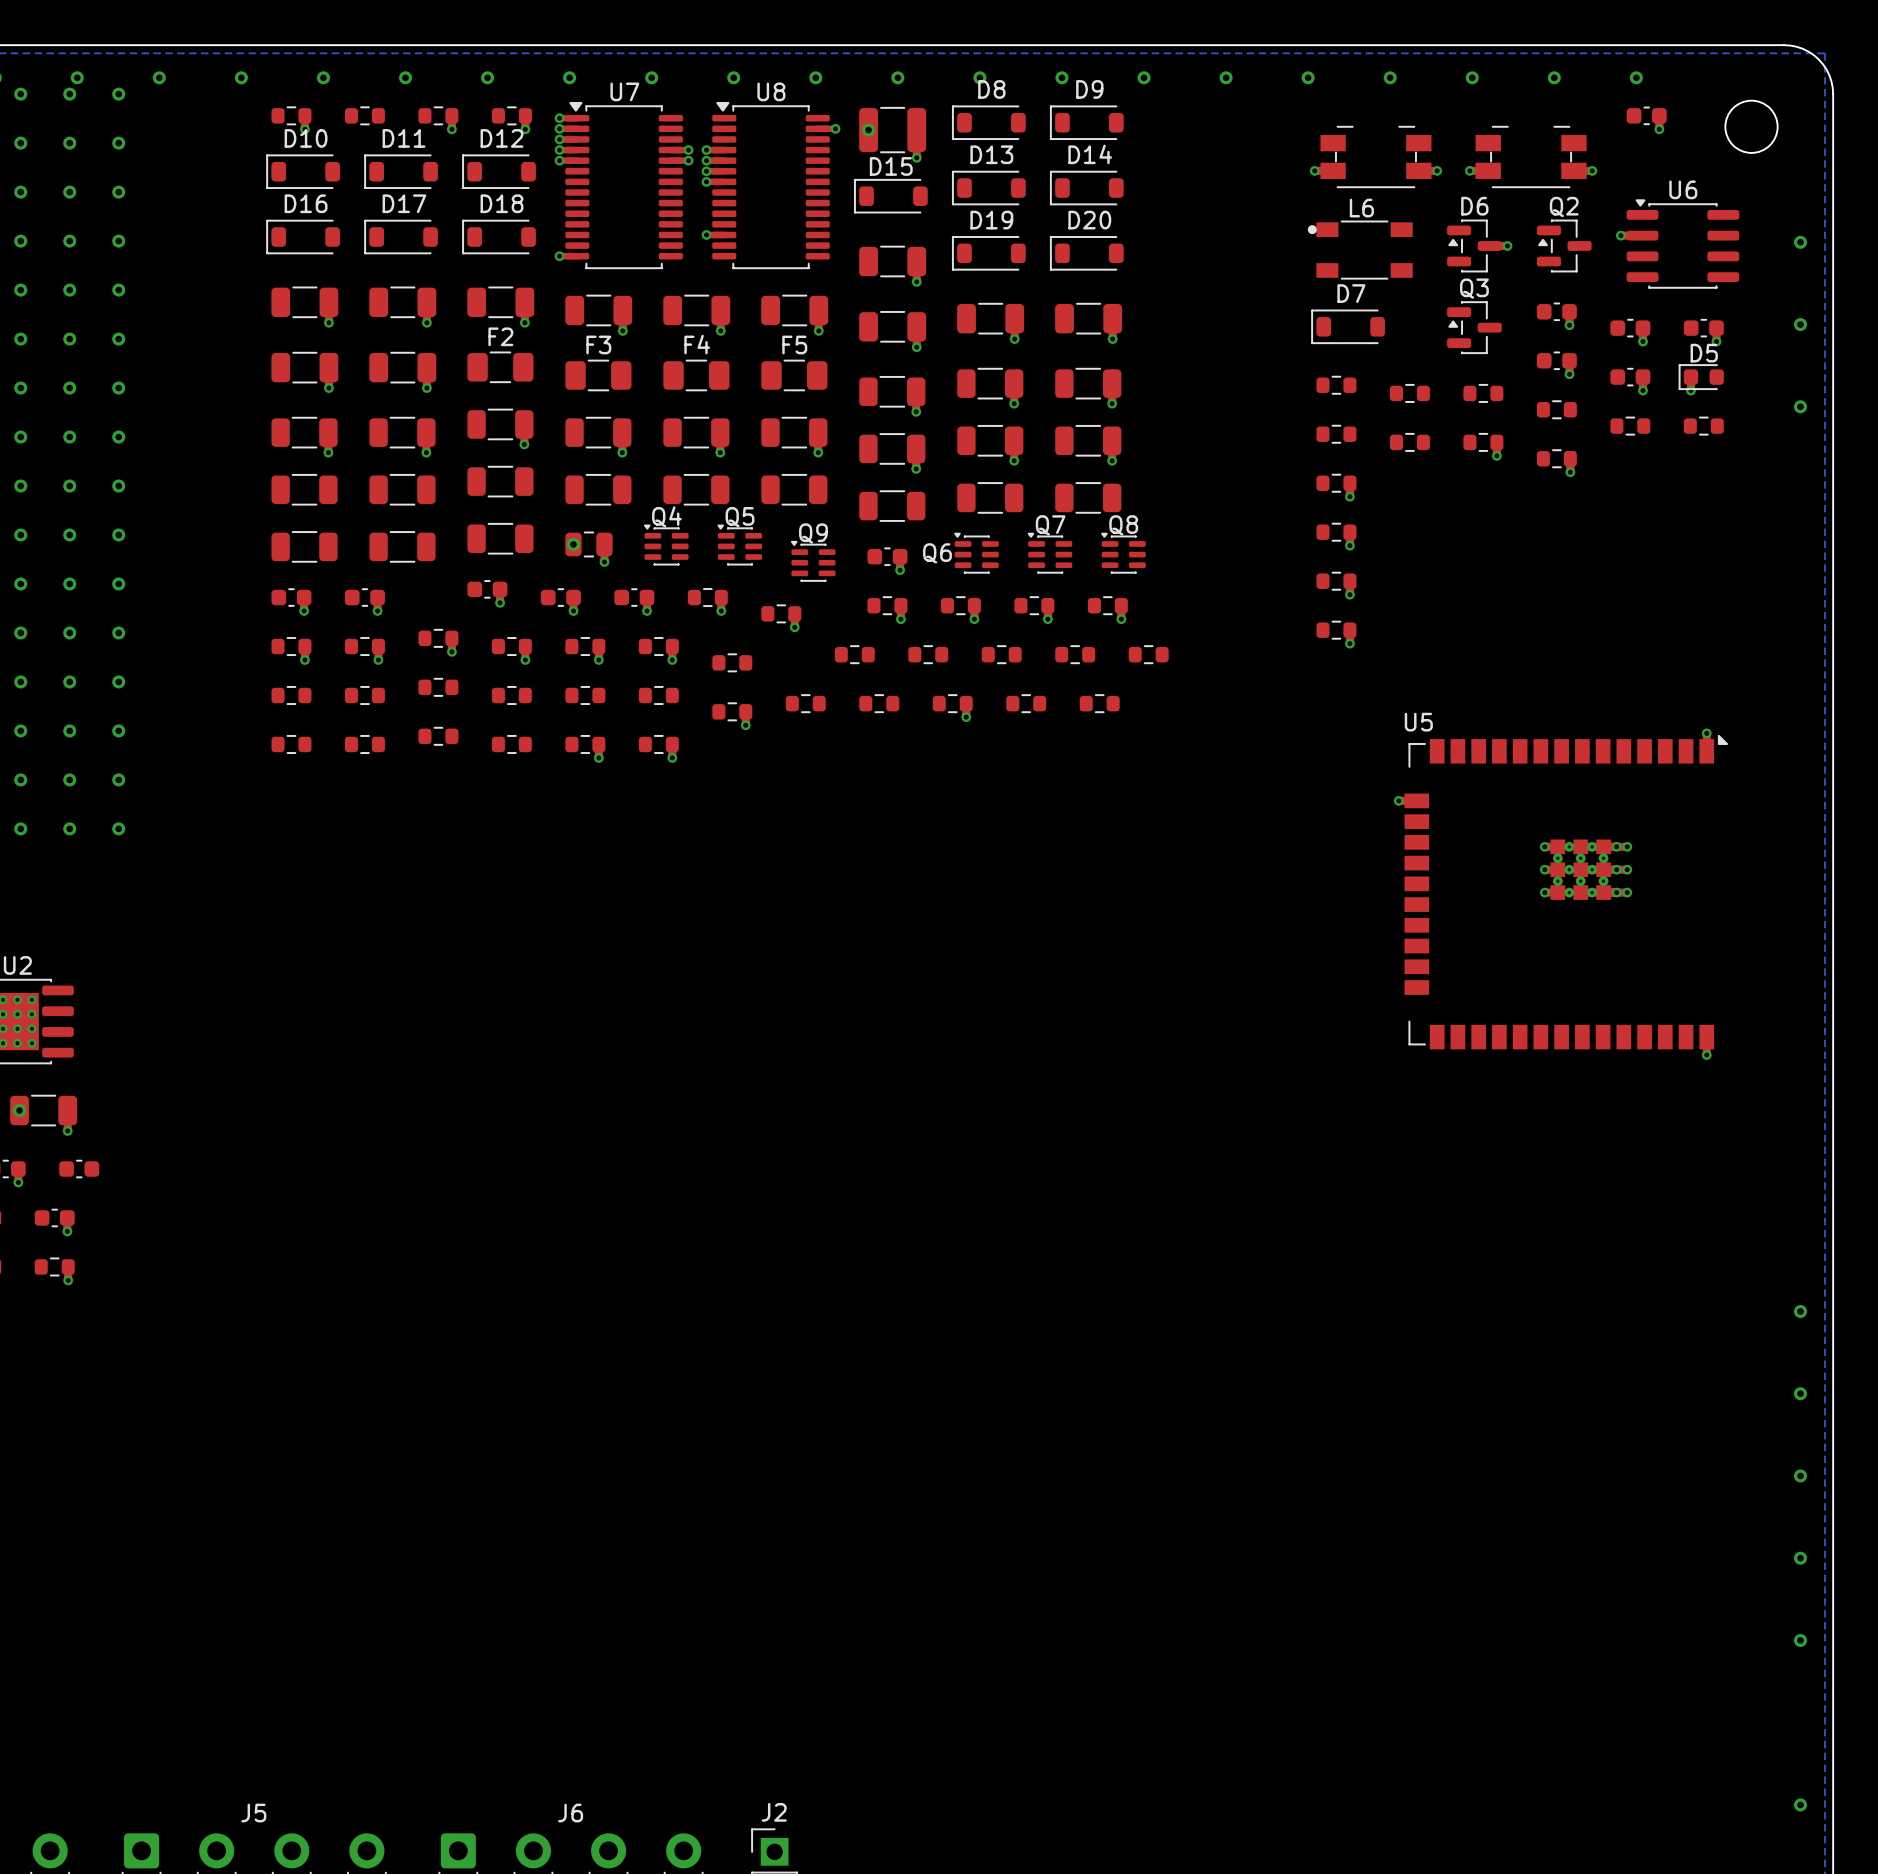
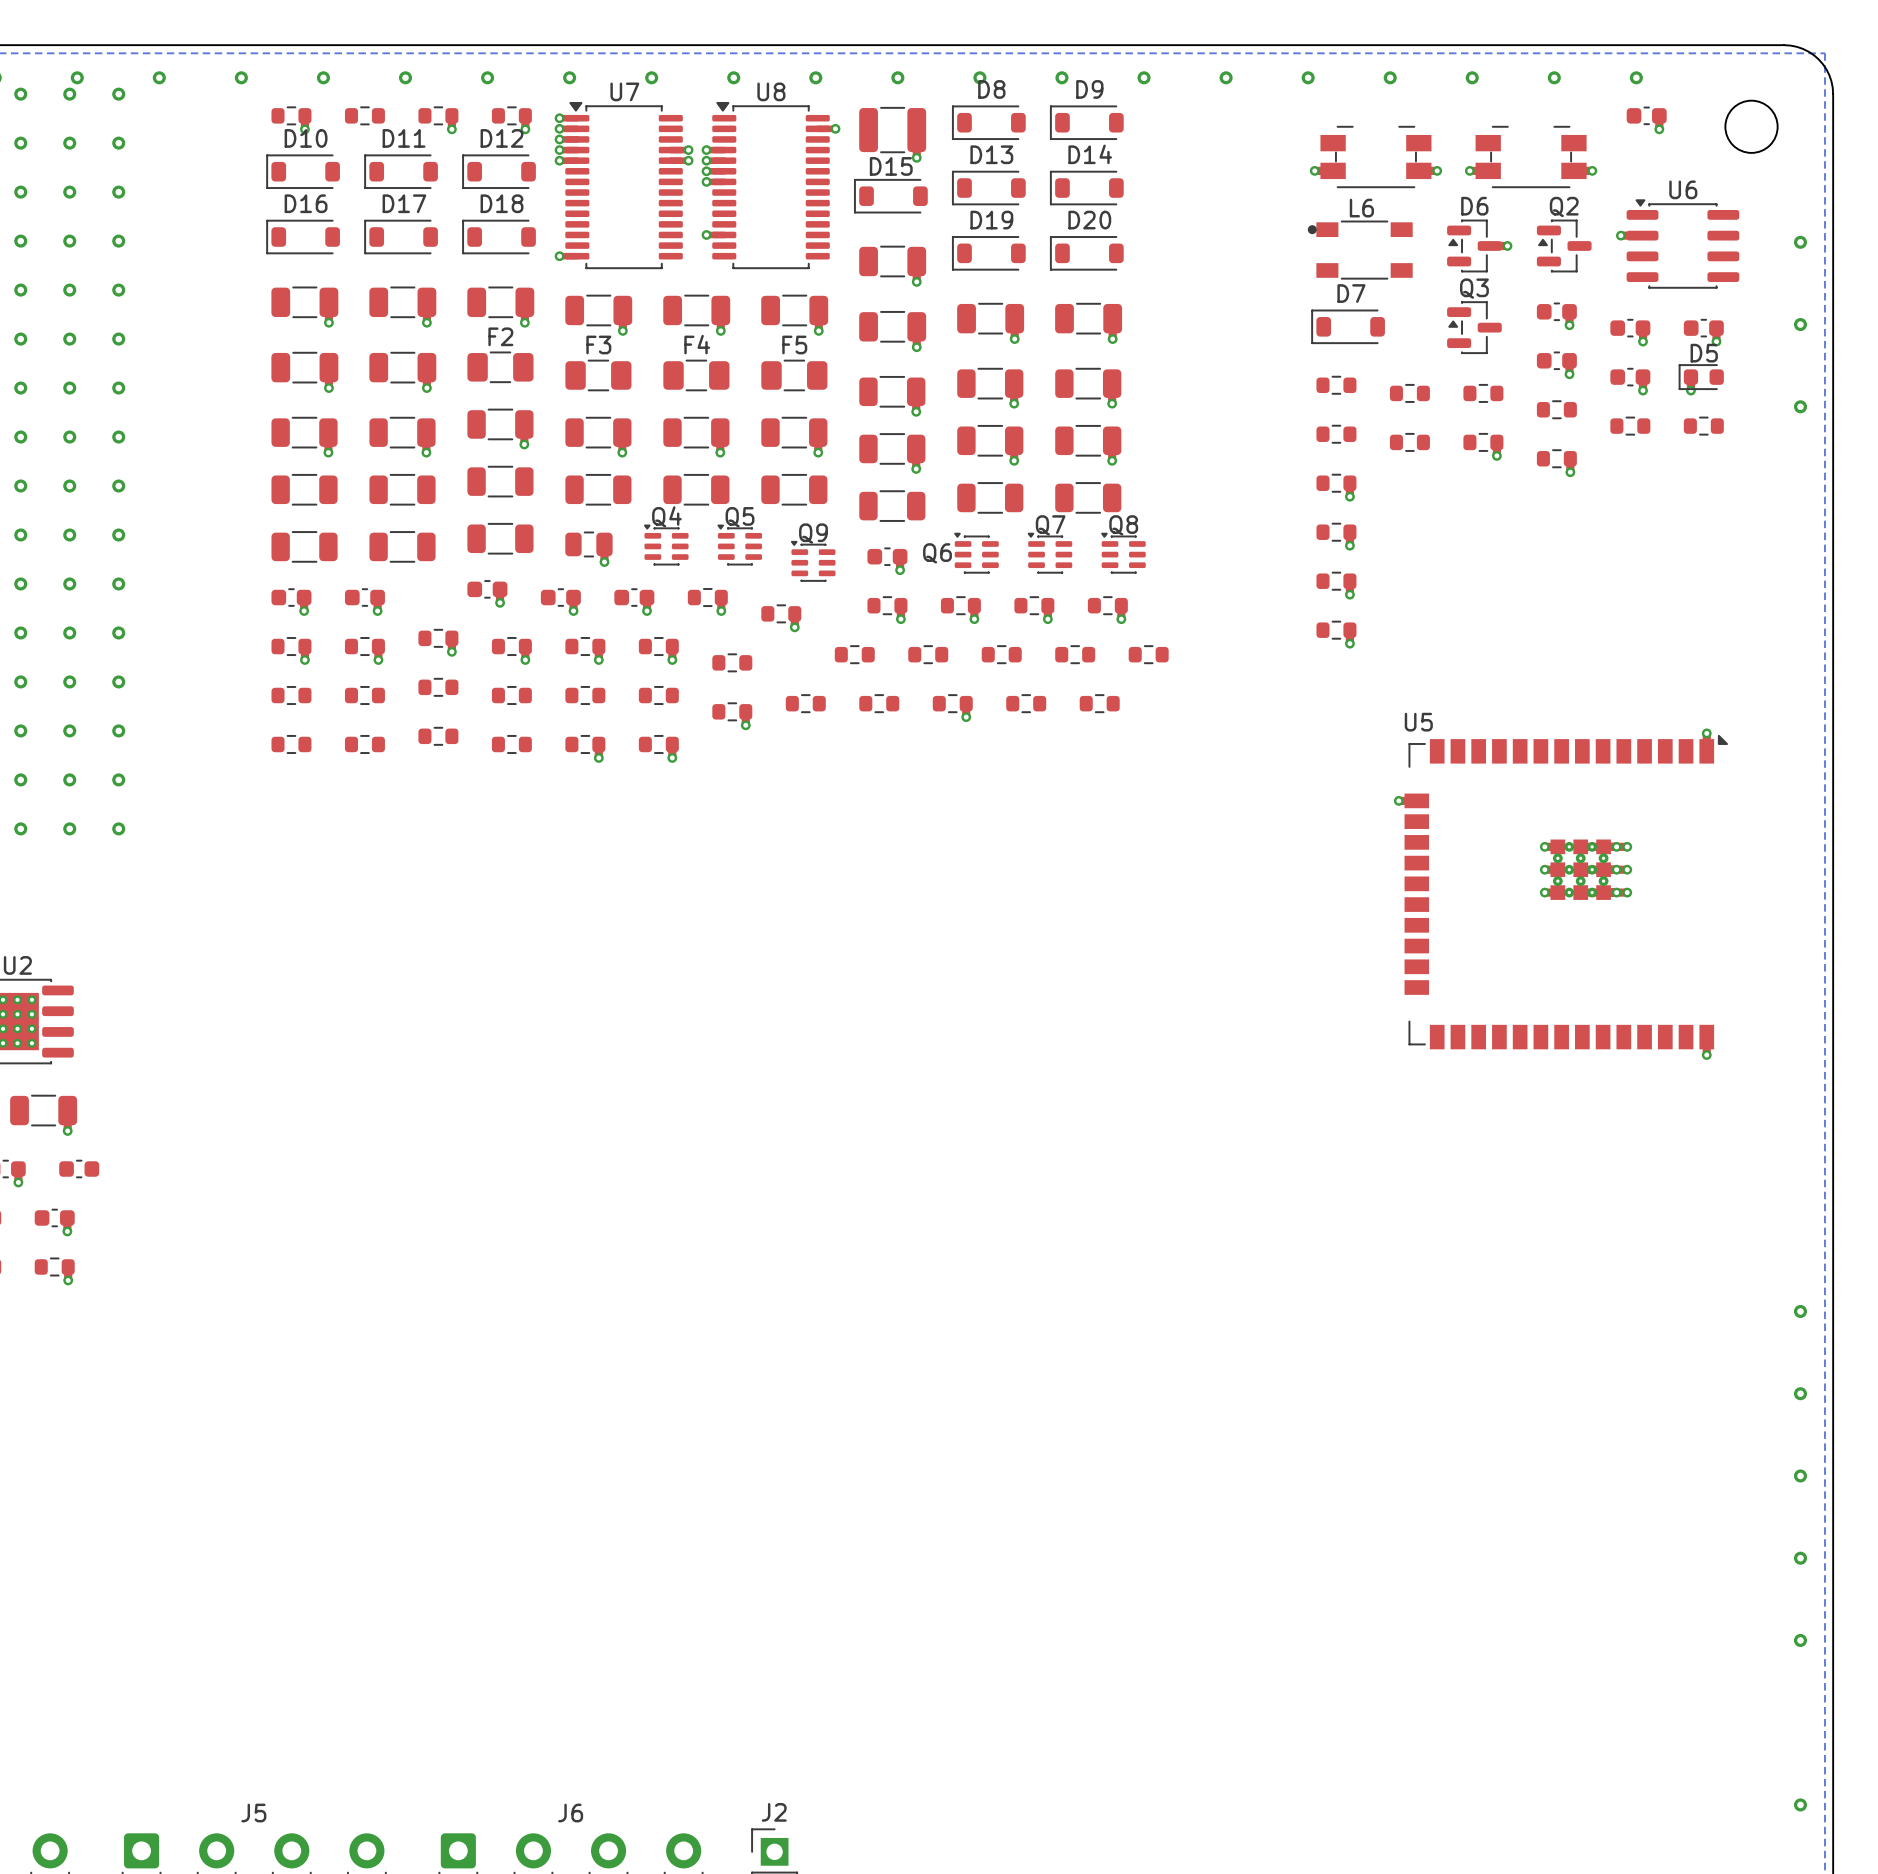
via: (868, 130) -> none
via: (573, 544) -> none
via: (19, 1110) -> none

